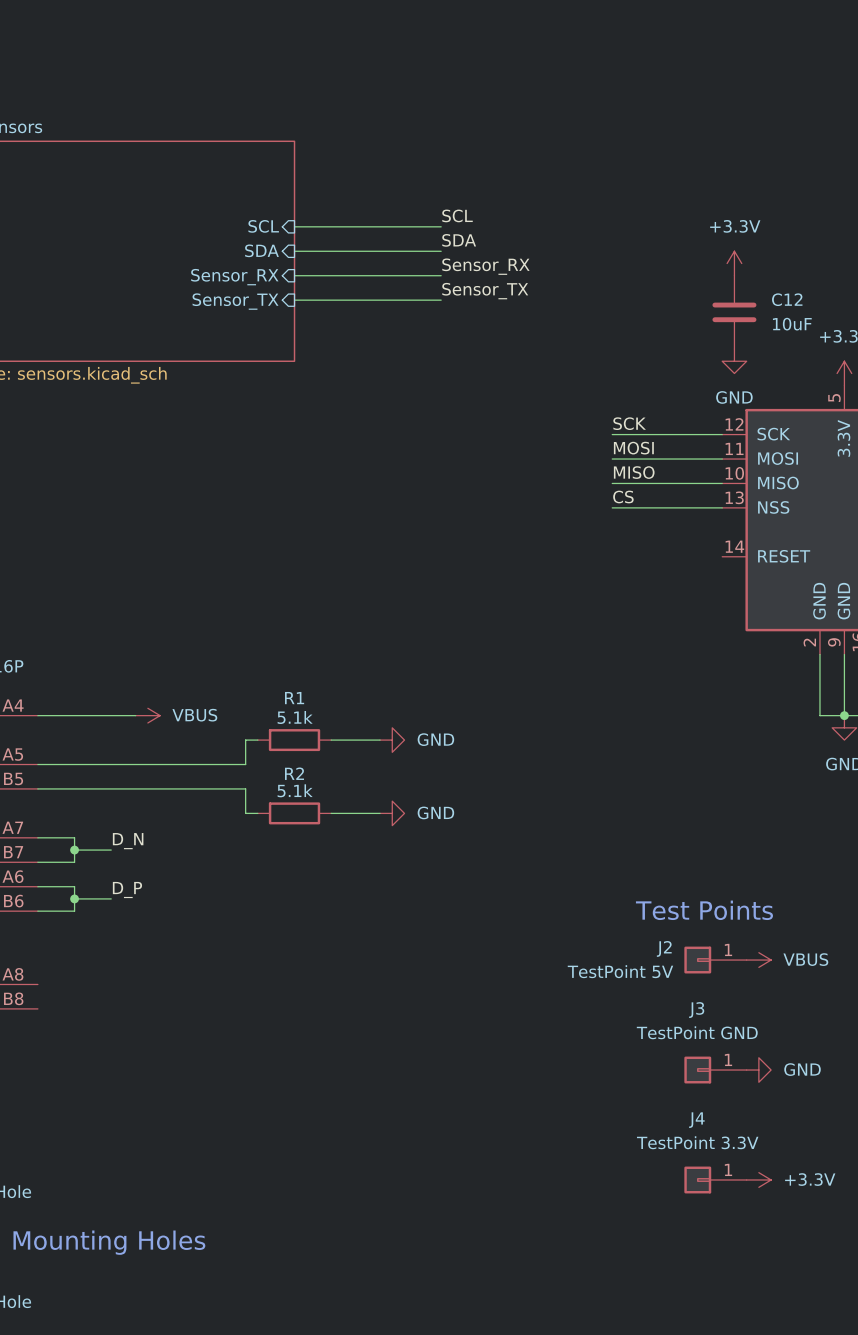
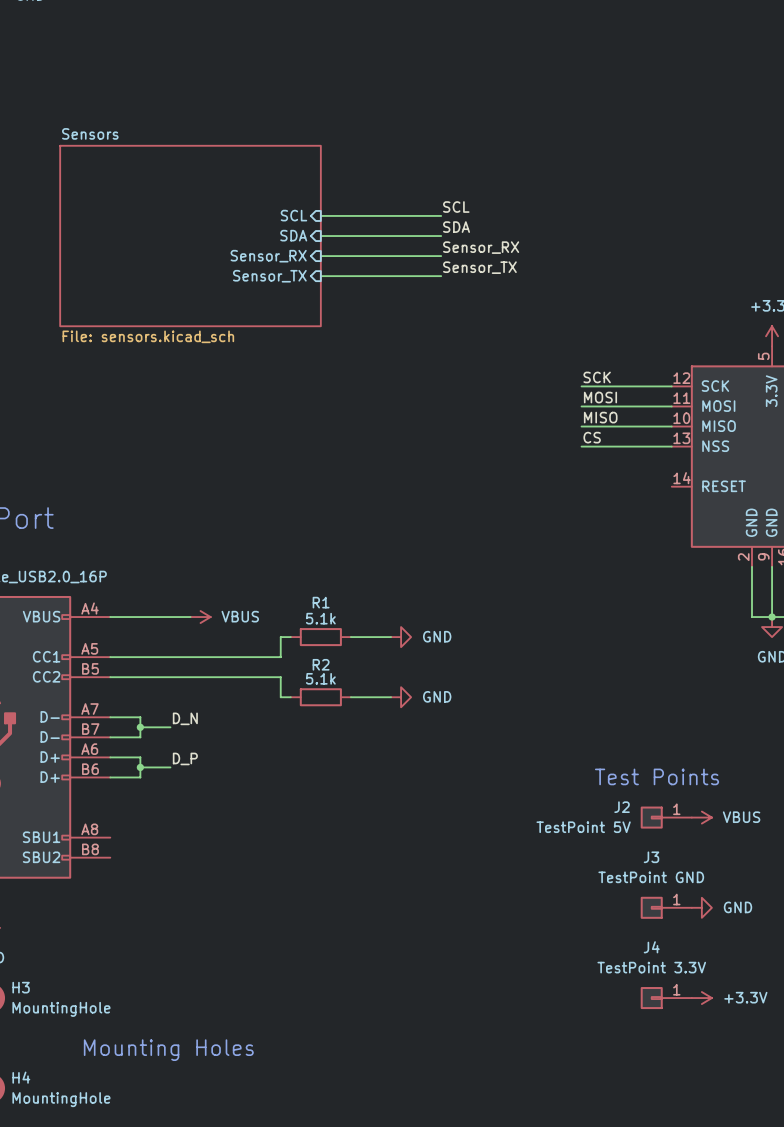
power symbol: +3.3V (734, 263) -> none
C12: 10uF (734, 312) -> none
power symbol: GND (734, 361) -> none

